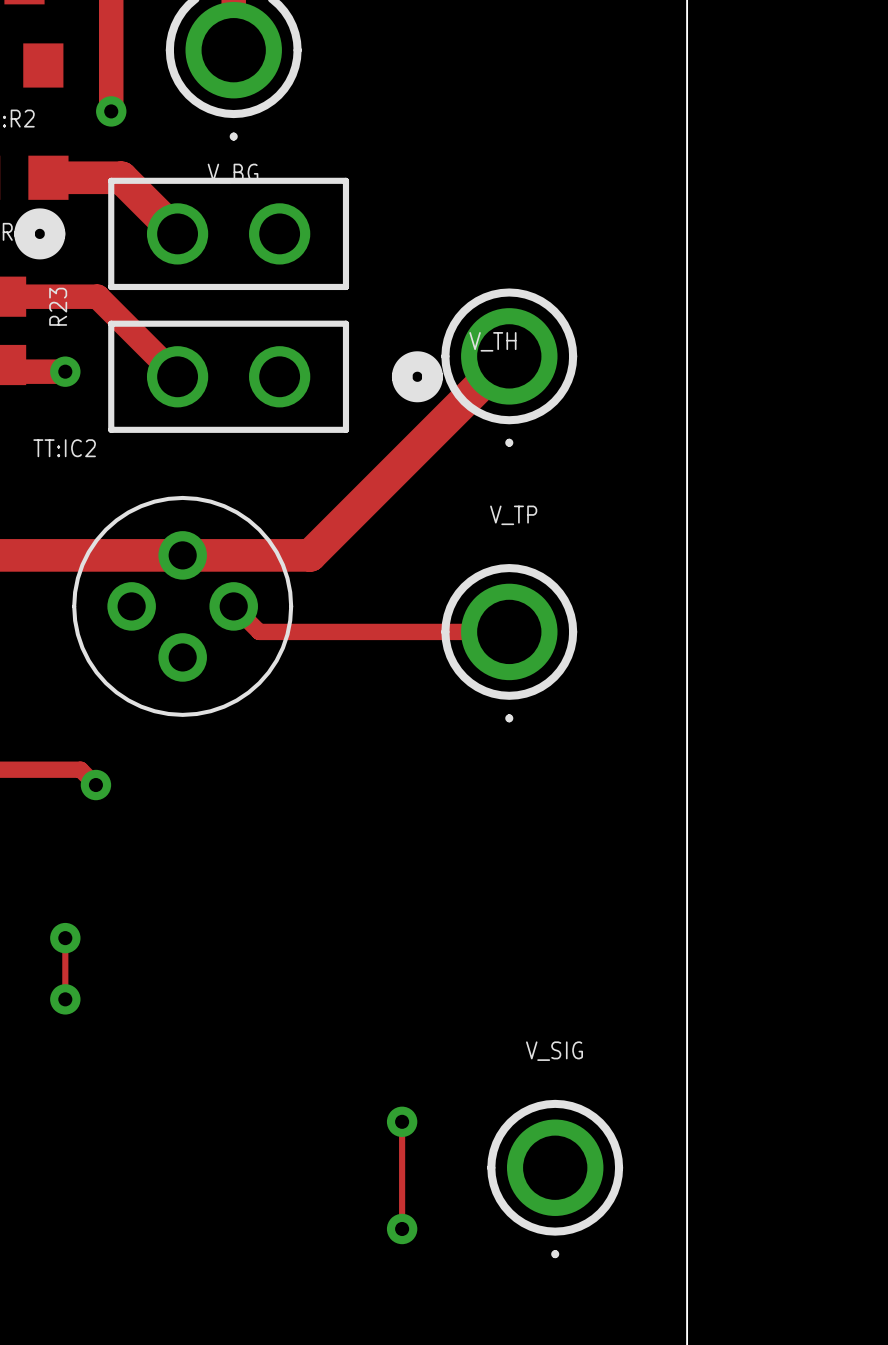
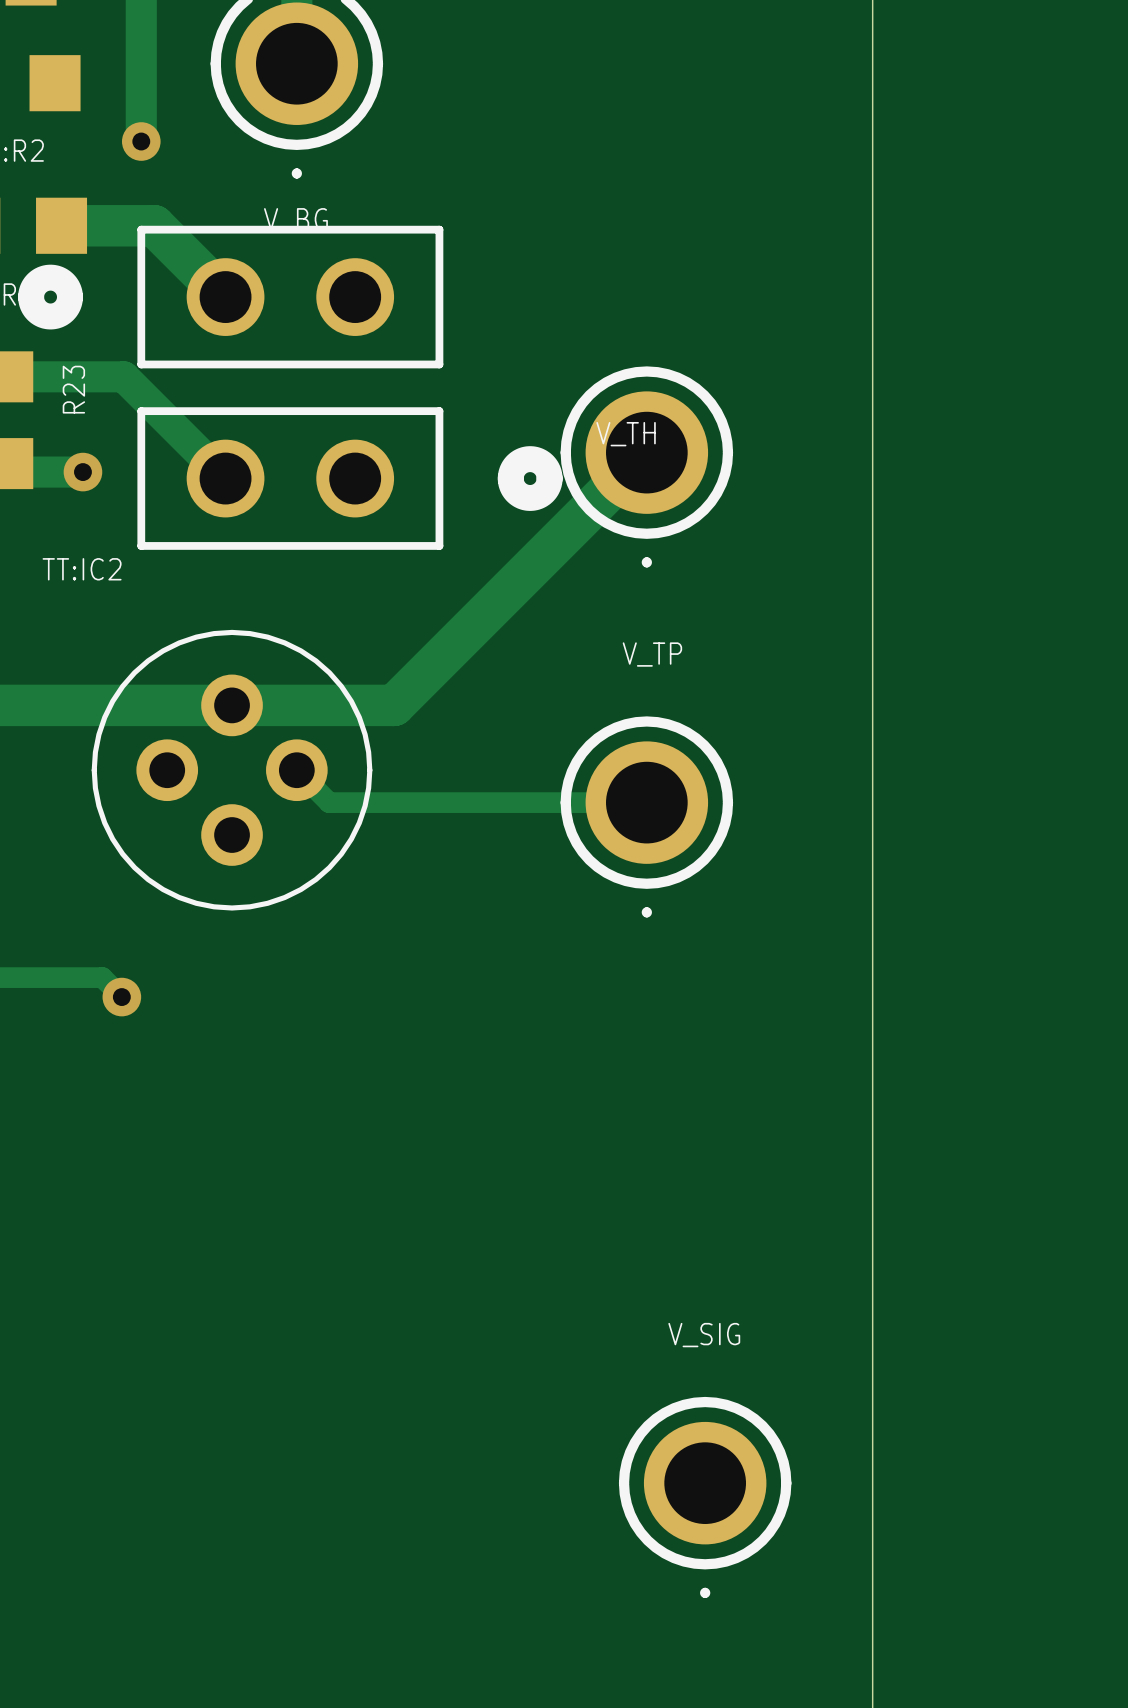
track: (65, 938) (65, 999) -> none
via: (65, 938) -> none
via: (65, 999) -> none
track: (402, 1121) (402, 1228) -> none
via: (402, 1121) -> none
via: (402, 1228) -> none

